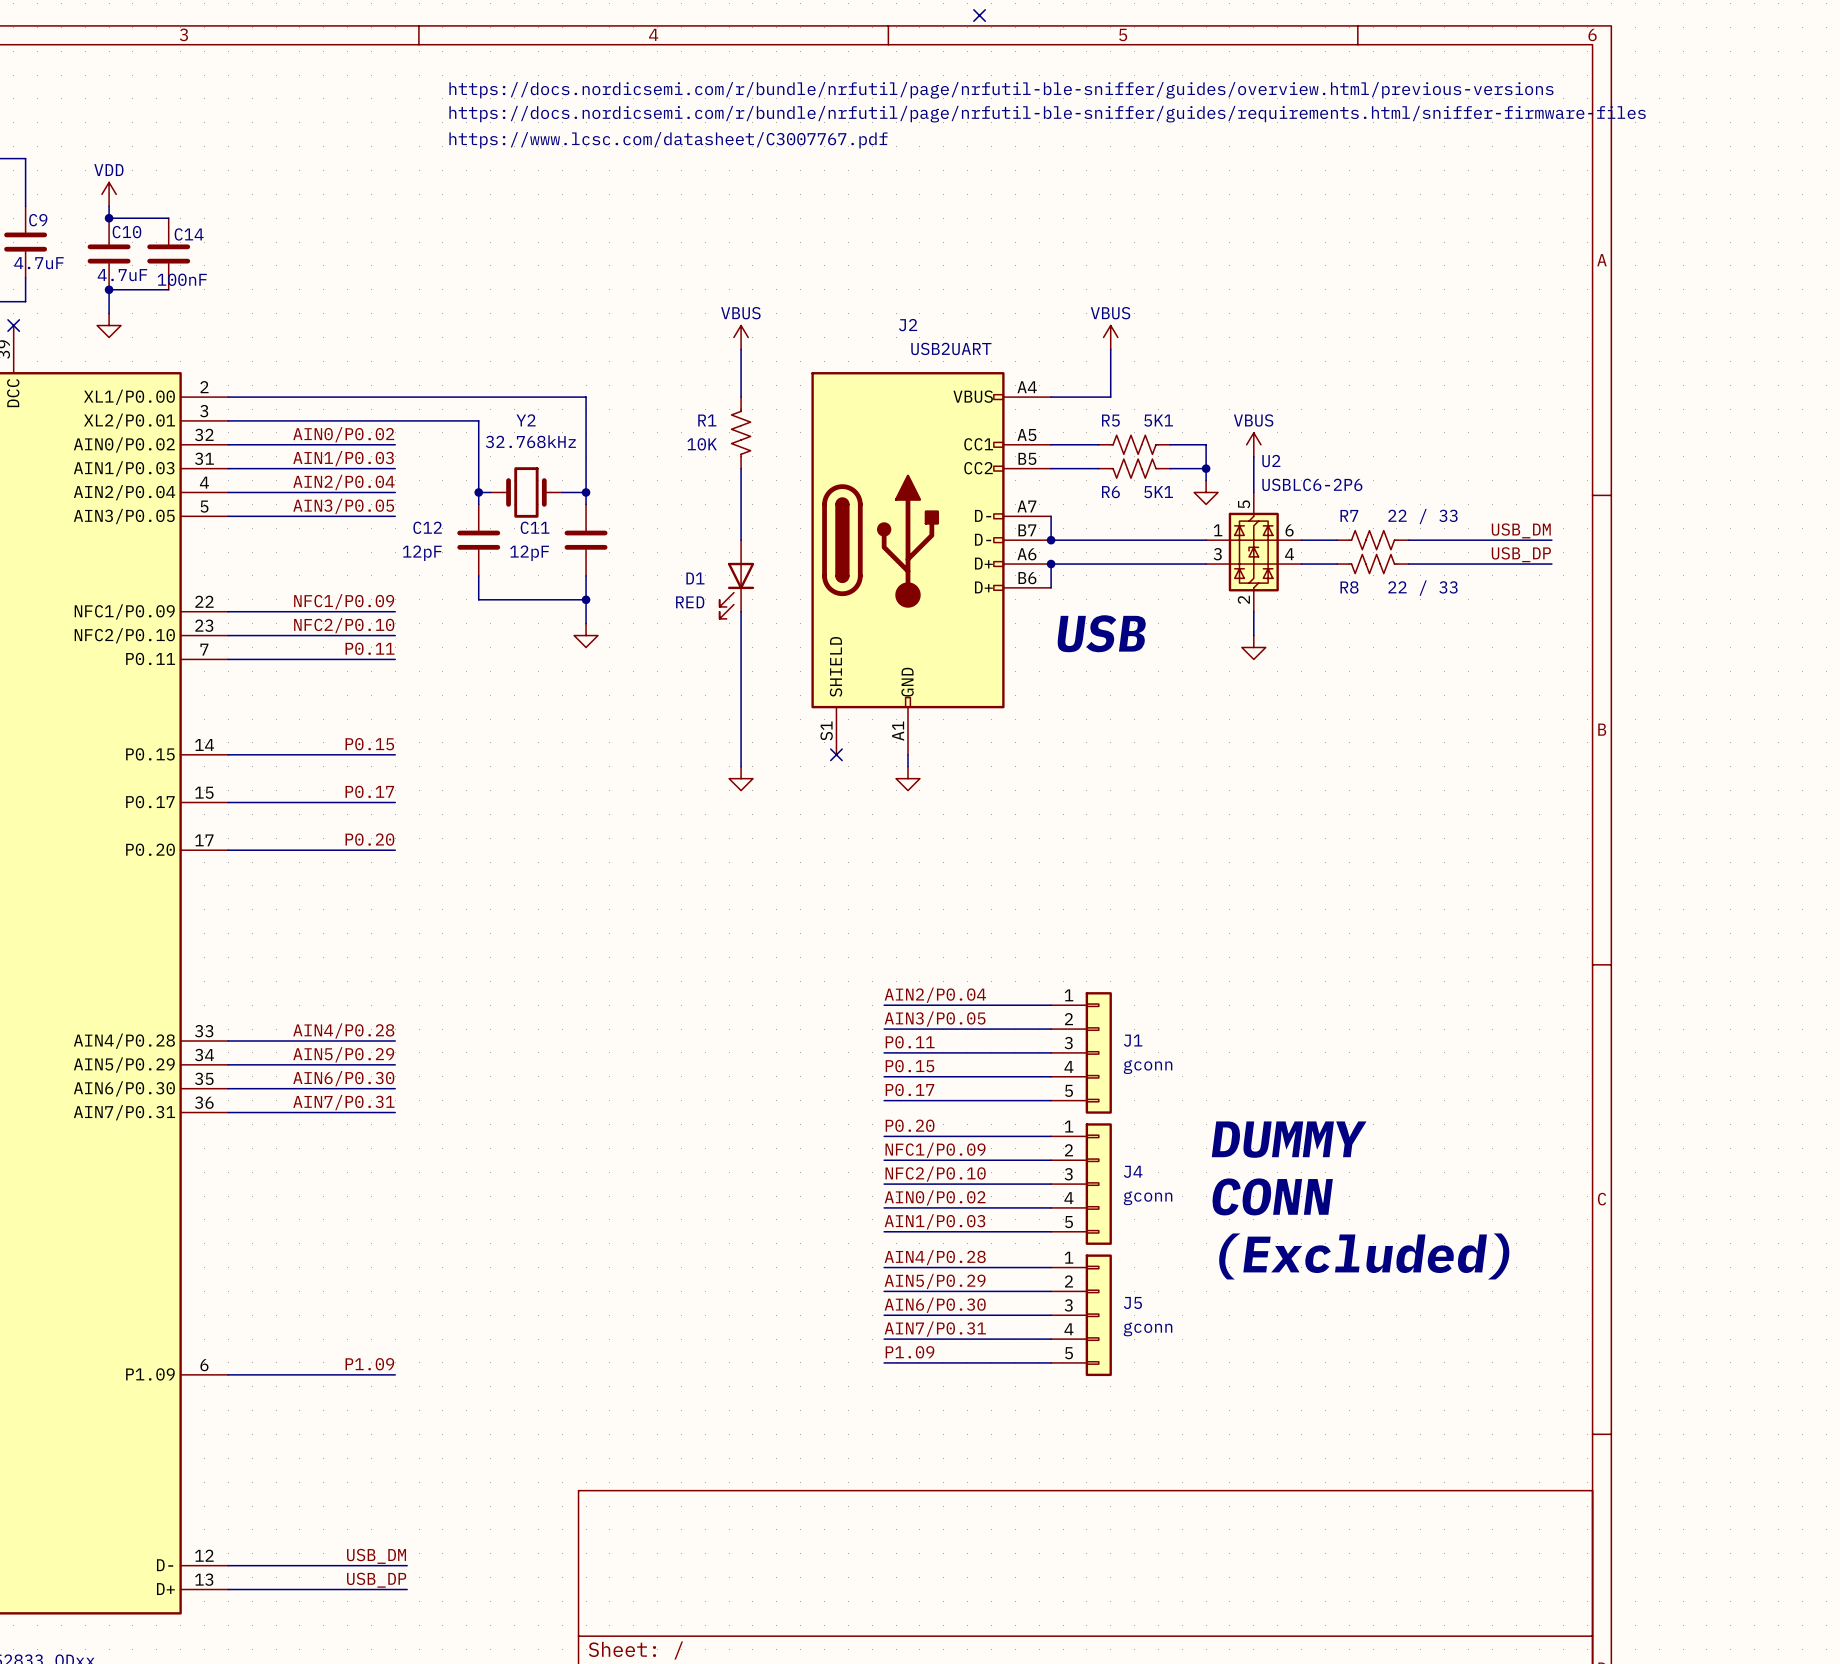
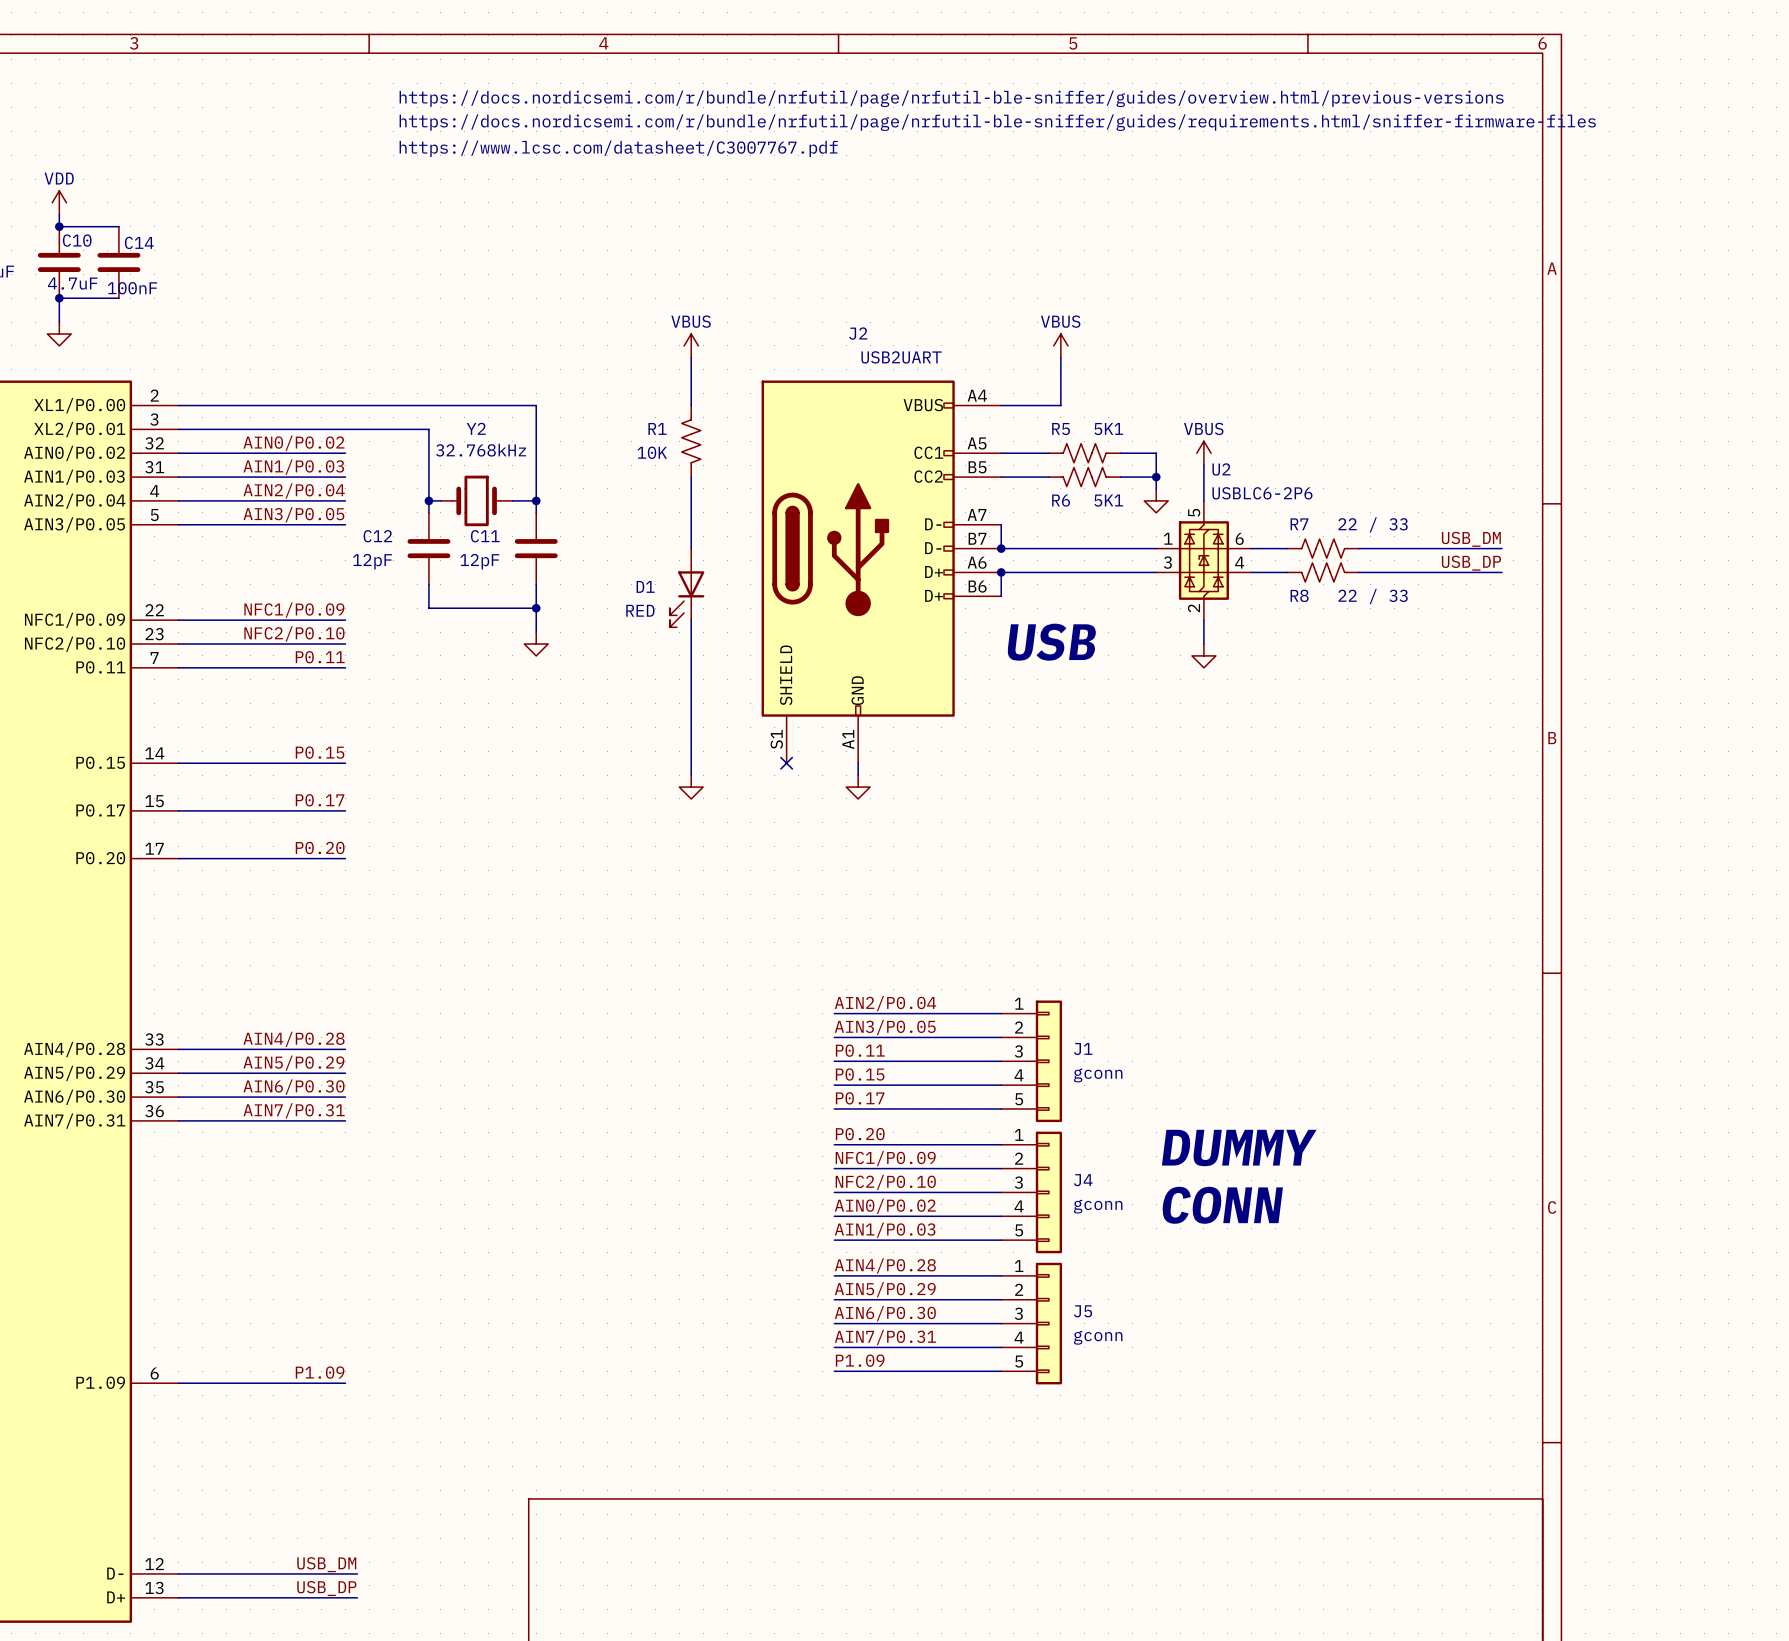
no-connect mark: (979, 15) -> none
text: (Excluded) (1364, 1256) -> none

